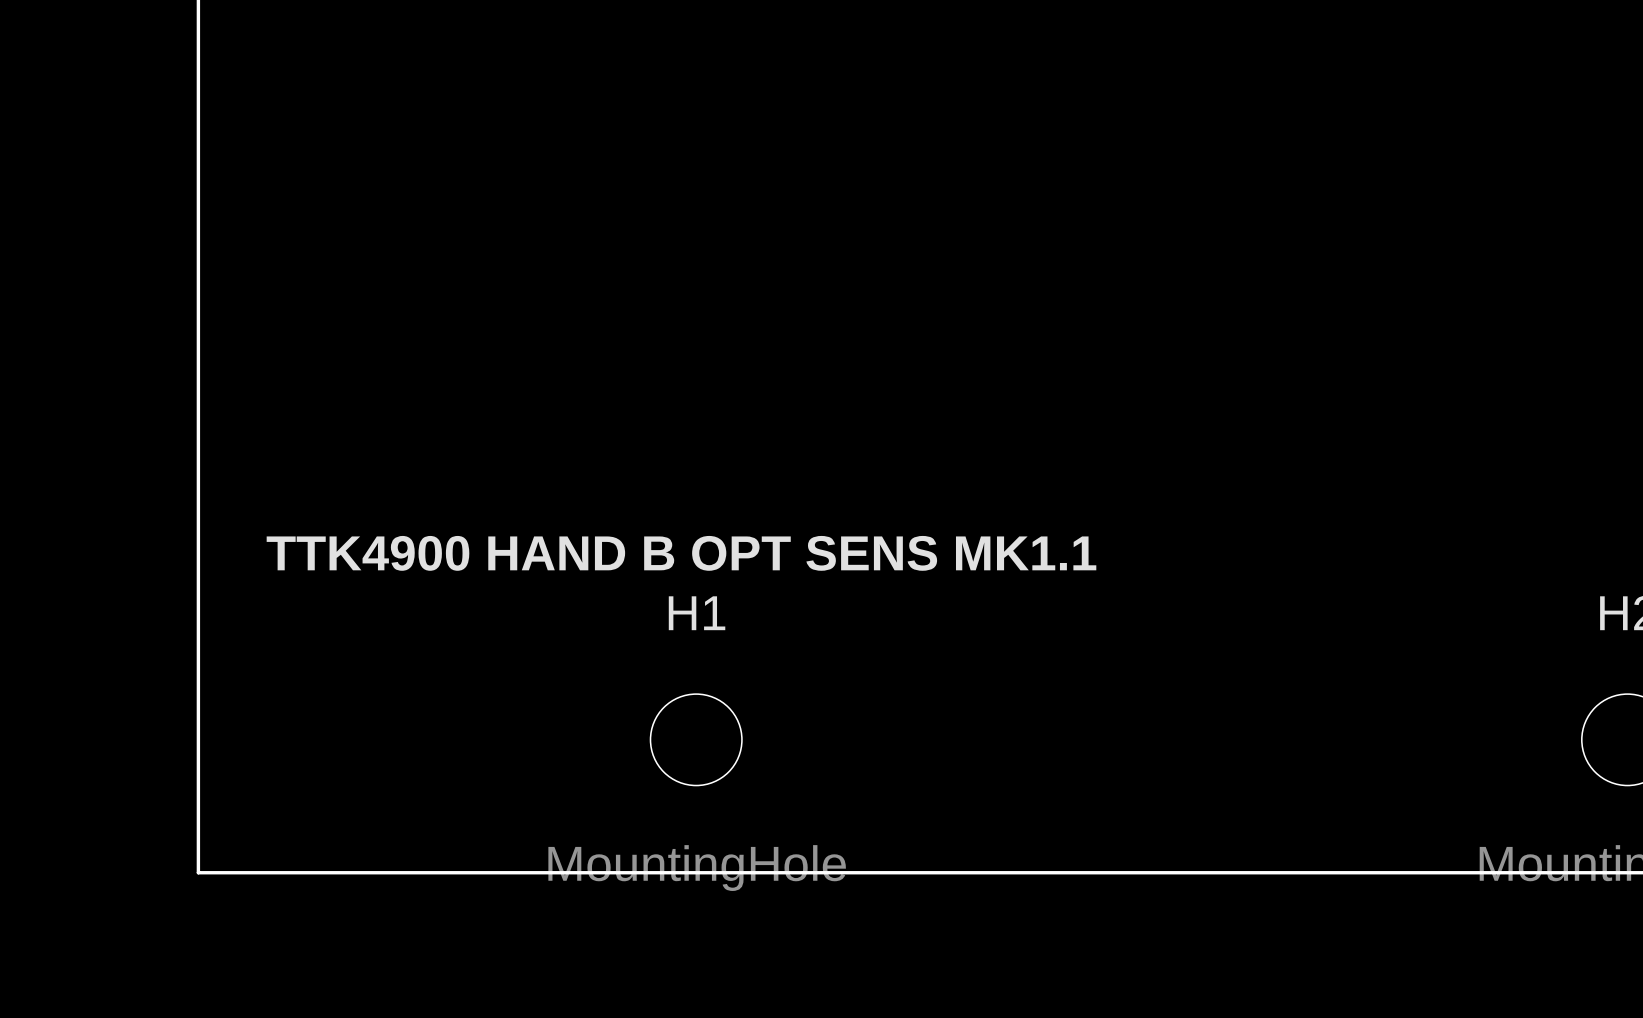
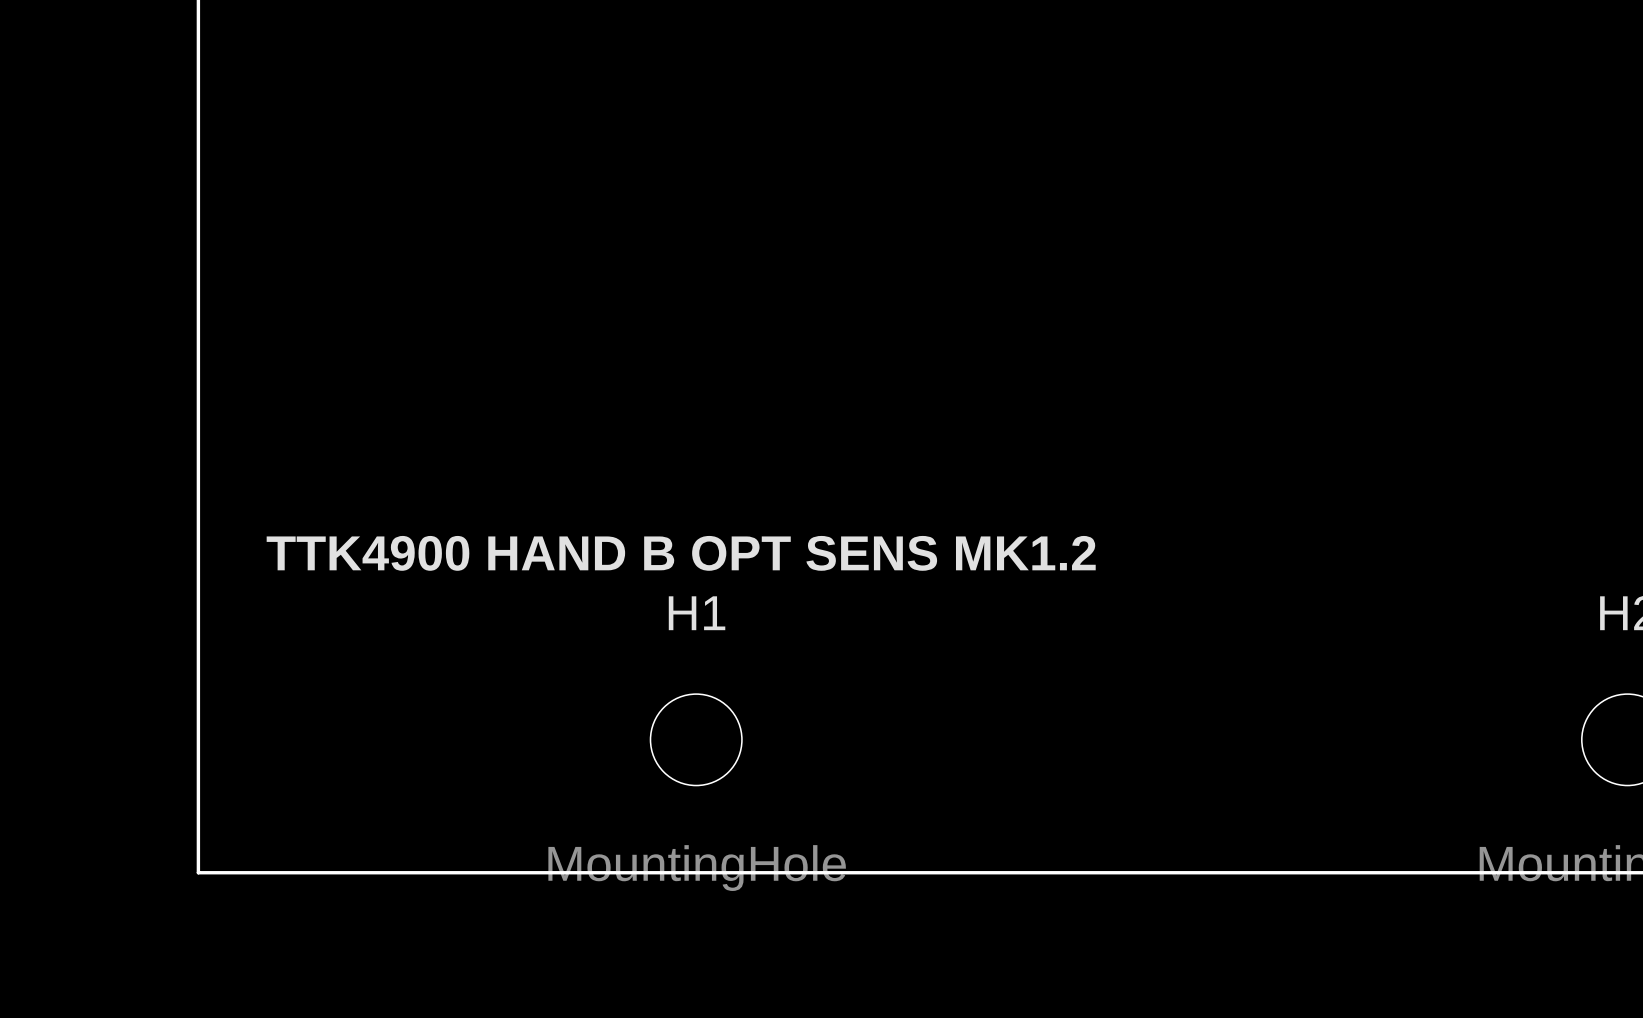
text: TTK4900 HAND B OPT SENS MK1.1 (681, 553) -> TTK4900 HAND B OPT SENS MK1.2 (681, 553)

